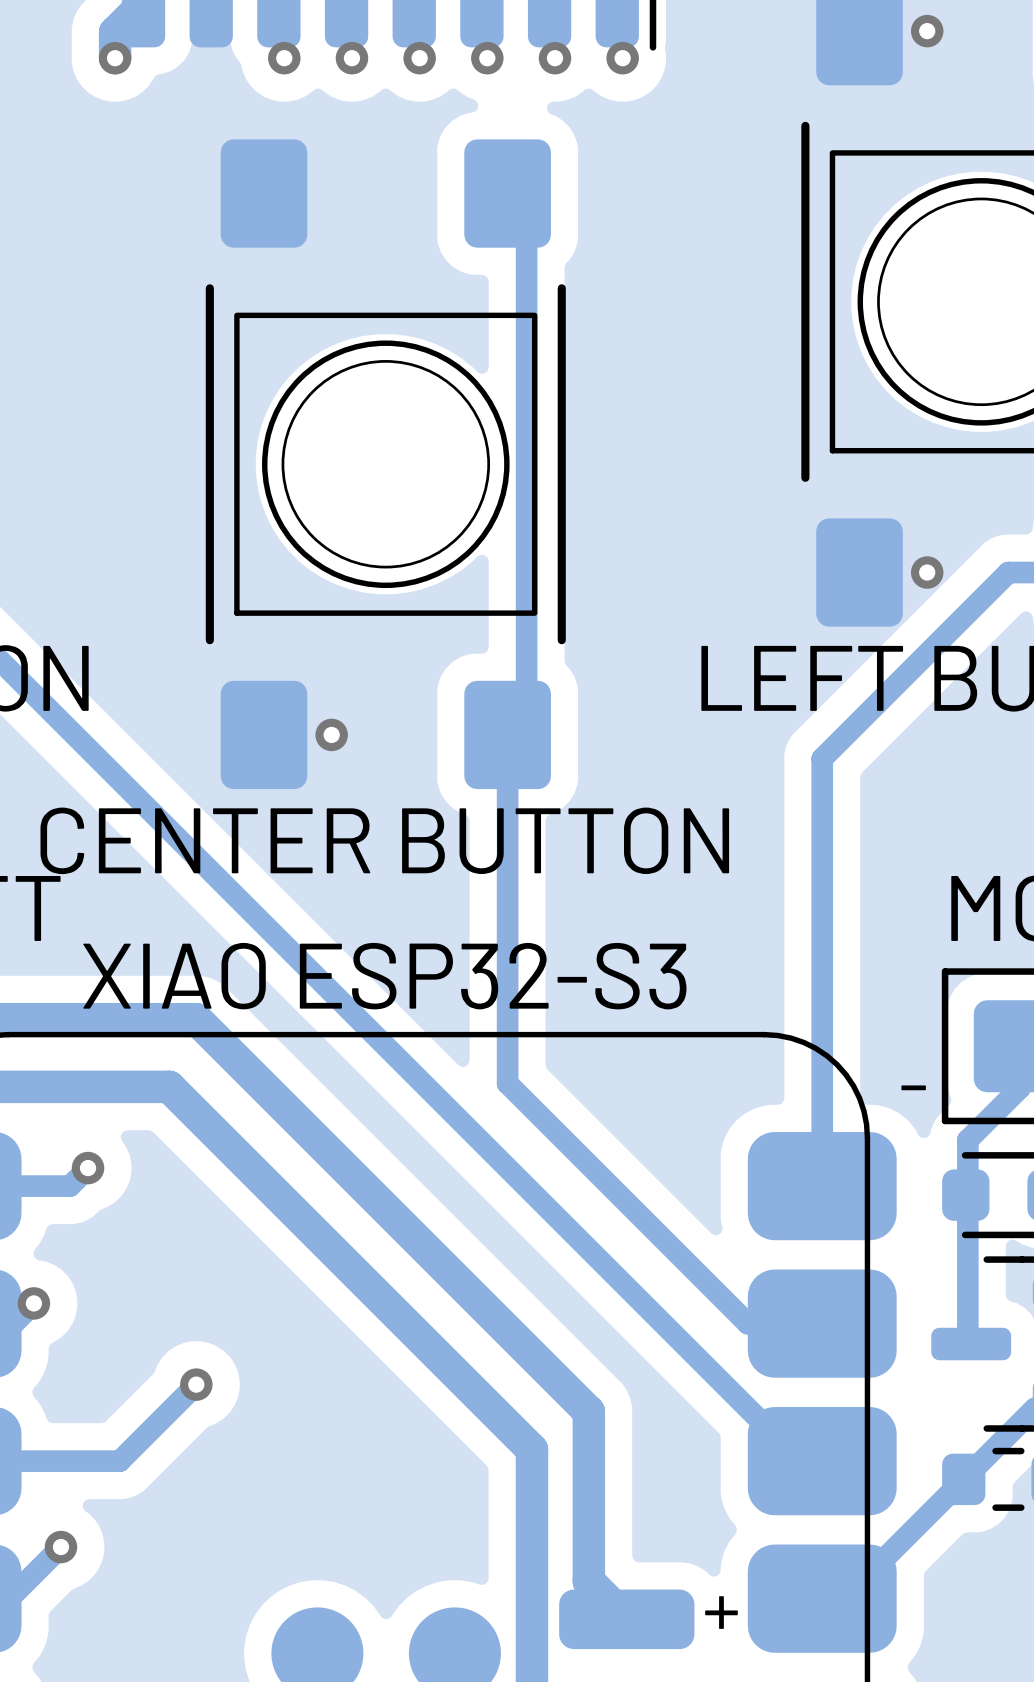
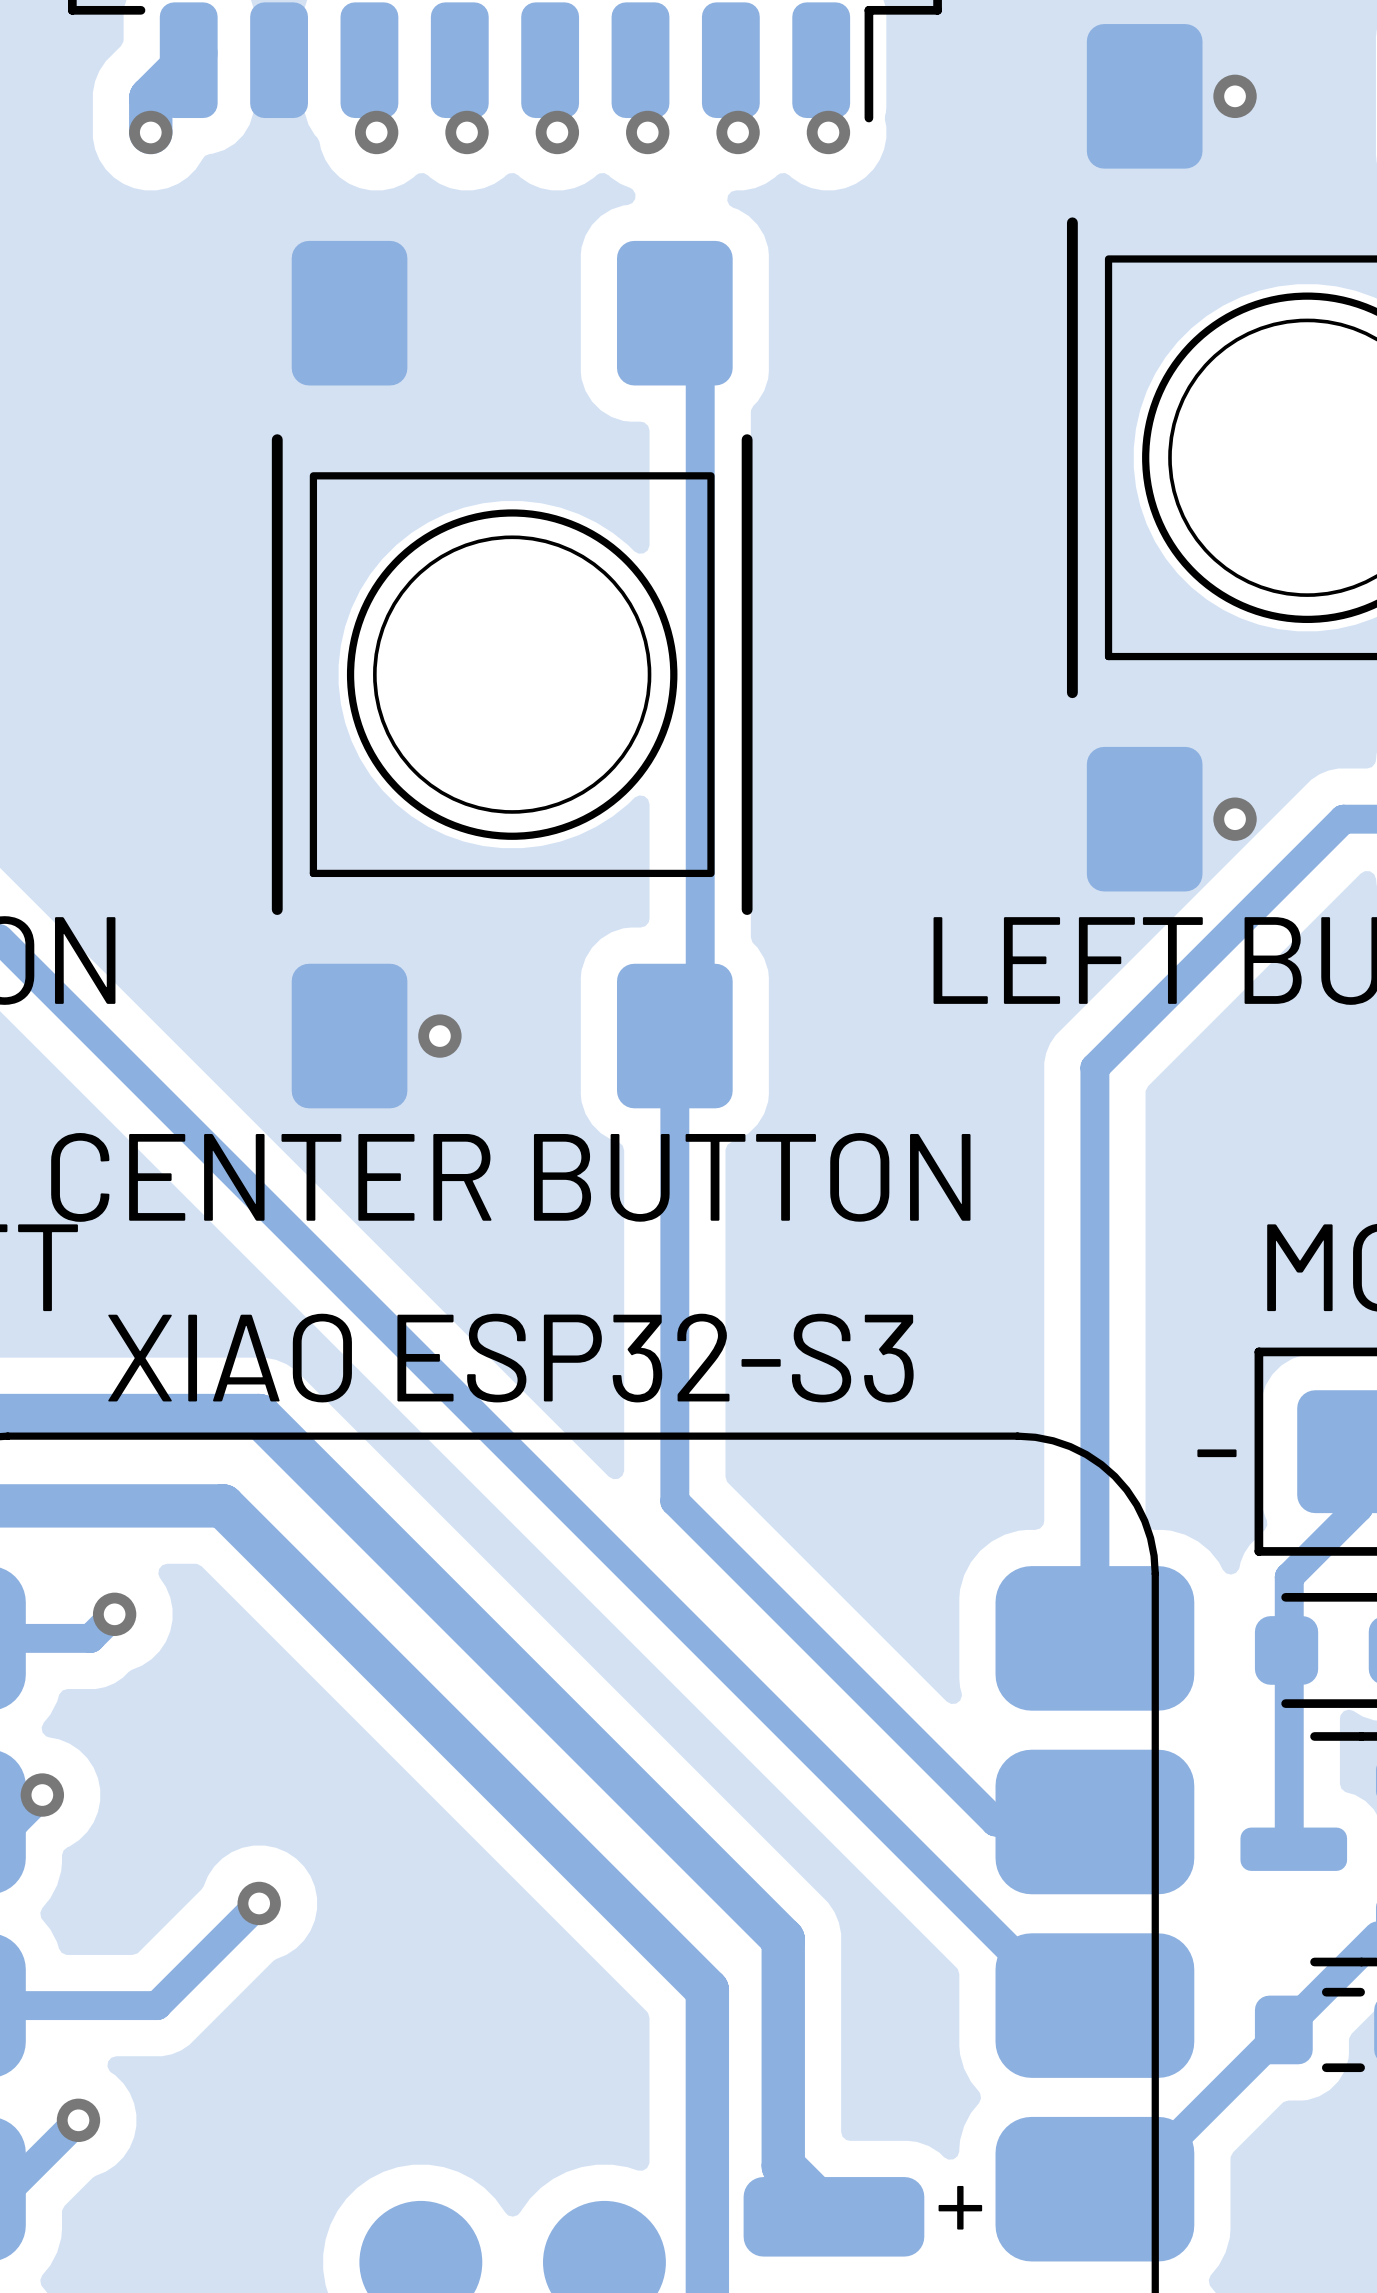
text position: - (913, 1087) -> - (1216, 1453)

